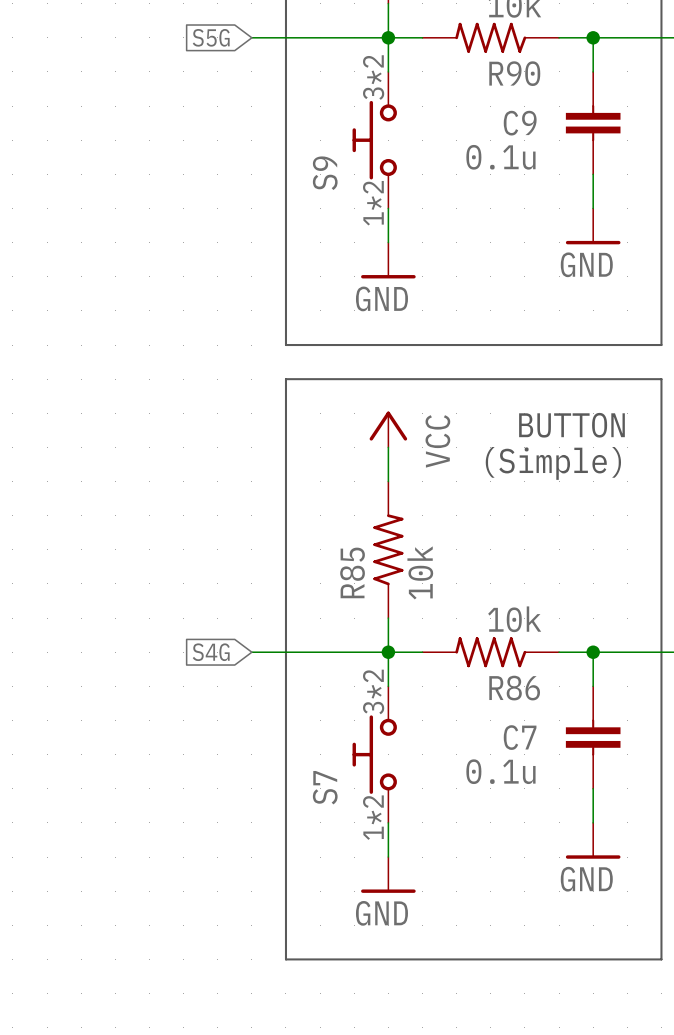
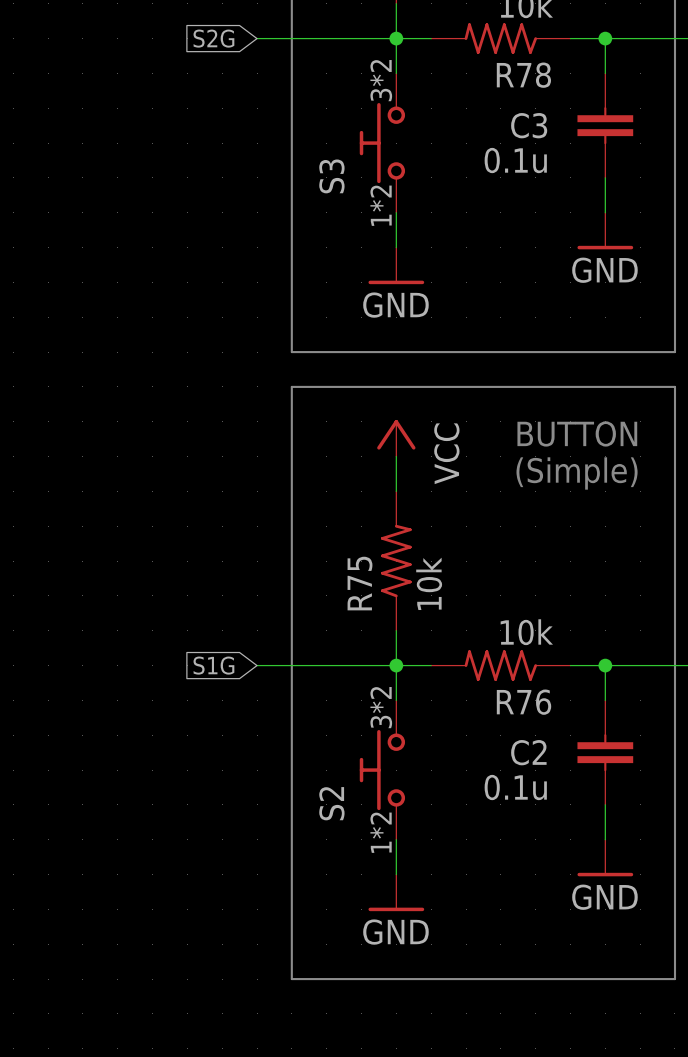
global label: S5G (211, 37) -> S2G (213, 38)
R90 name: R90 (514, 73) -> R78 (523, 75)
C9 name: C9 (520, 123) -> C3 (529, 125)
S9 name: S9 (325, 173) -> S3 (331, 176)
R85 name: R85 (352, 572) -> R75 (359, 583)
global label: S4G (211, 652) -> S1G (213, 665)
R86 name: R86 (514, 688) -> R76 (524, 702)
C7 name: C7 (520, 737) -> C2 (528, 752)
S7 name: S7 (325, 787) -> S2 (331, 803)

